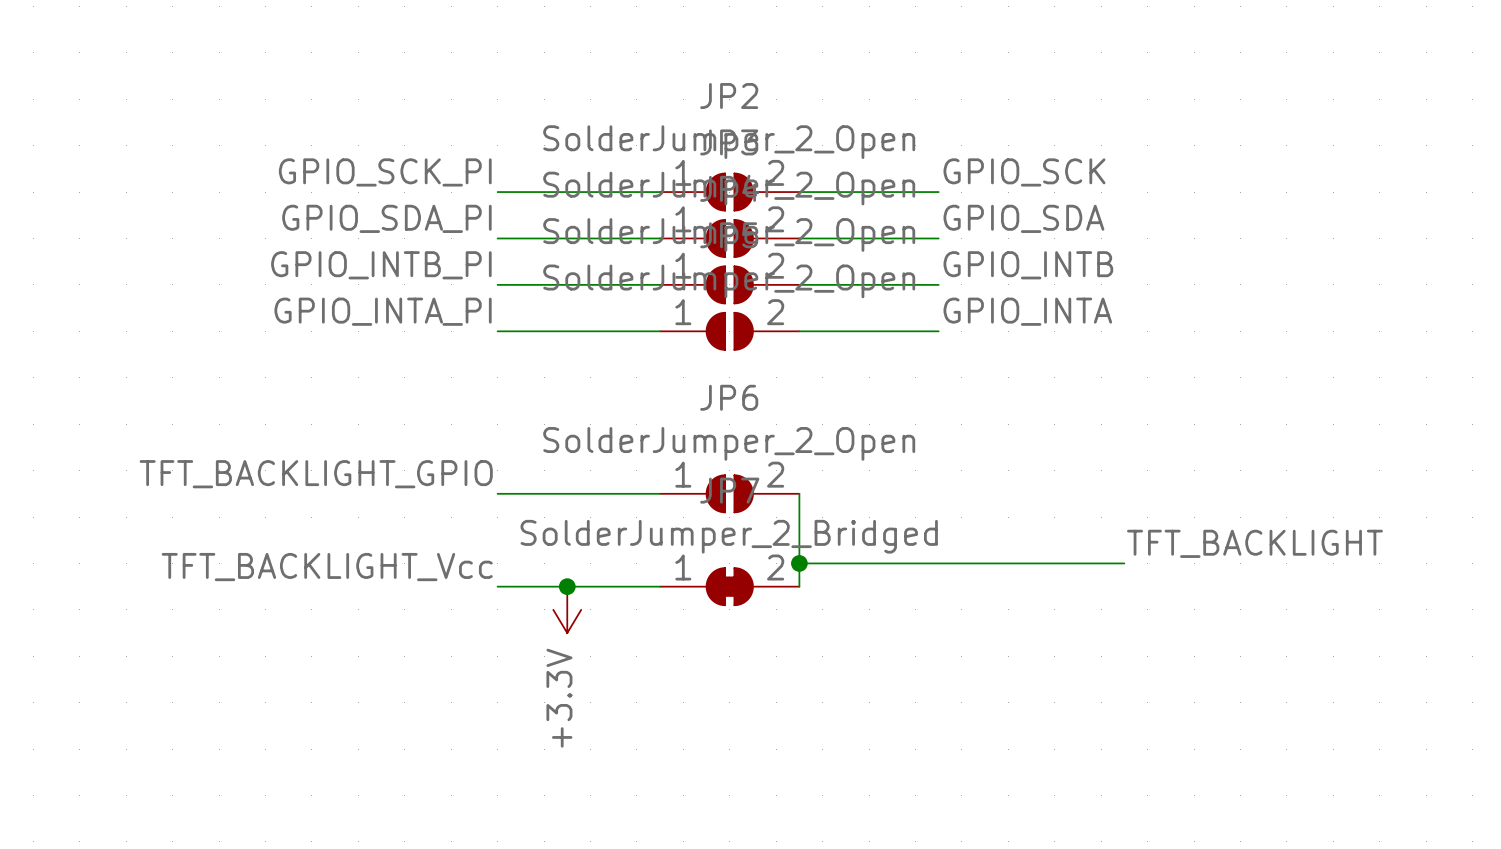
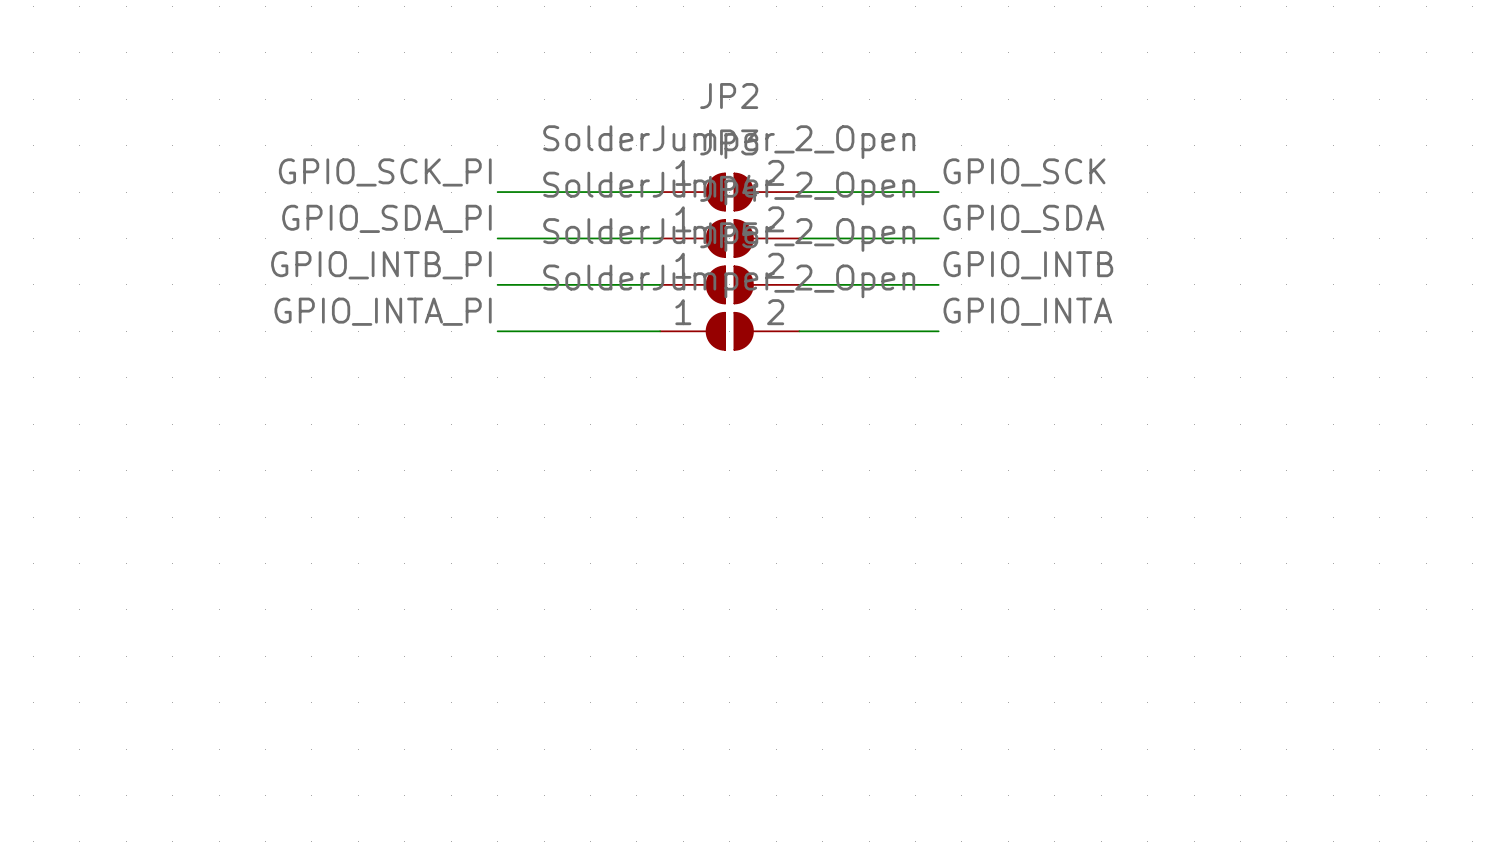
label: TFT_BACKLIGHT_GPIO (316, 474) -> none
wire: (497, 493) (660, 493) -> none
JP6: SolderJumper_2_Open (729, 493) -> none
wire: (799, 493) (799, 586) -> none
label: TFT_BACKLIGHT (1254, 543) -> none
wire: (799, 563) (1124, 563) -> none
junction: (799, 563) -> none
label: TFT_BACKLIGHT_Vcc (327, 567) -> none
wire: (497, 586) (660, 586) -> none
junction: (567, 586) -> none
JP7: SolderJumper_2_Bridged (729, 586) -> none
power symbol: +3.3V (567, 609) -> none

